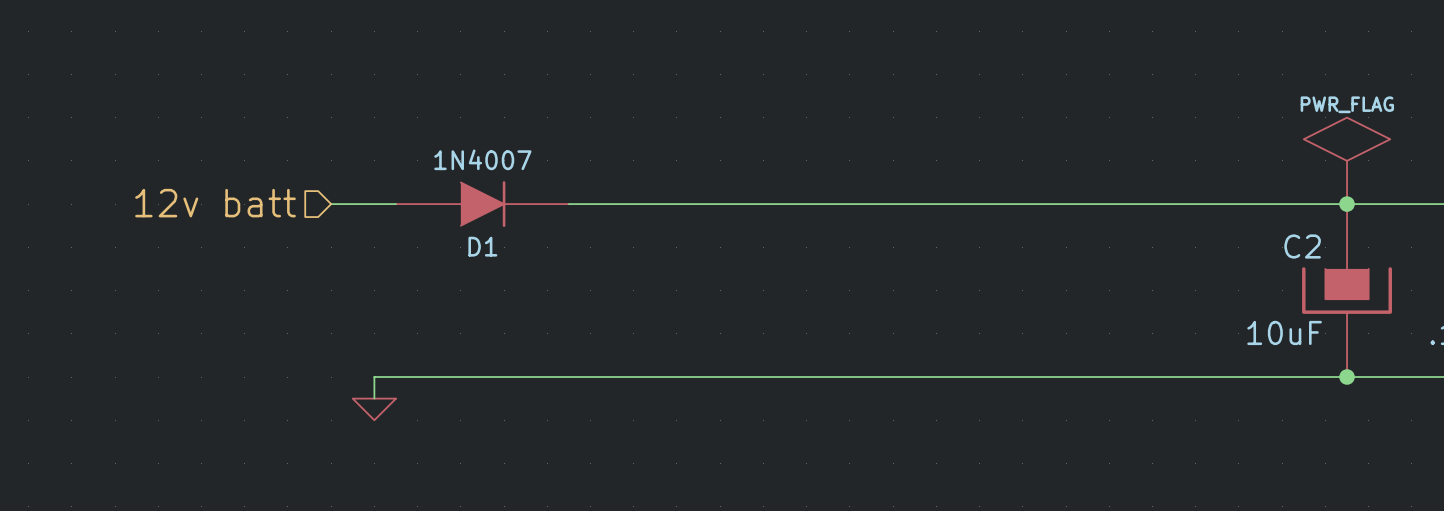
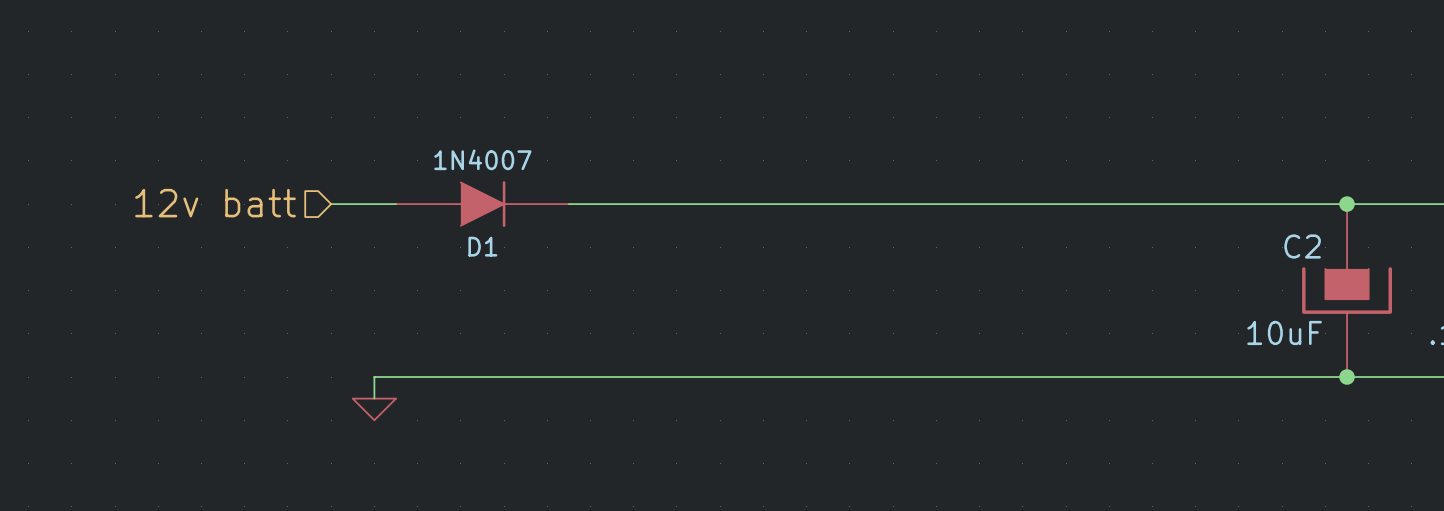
power symbol: PWR_FLAG (1347, 160) -> none

